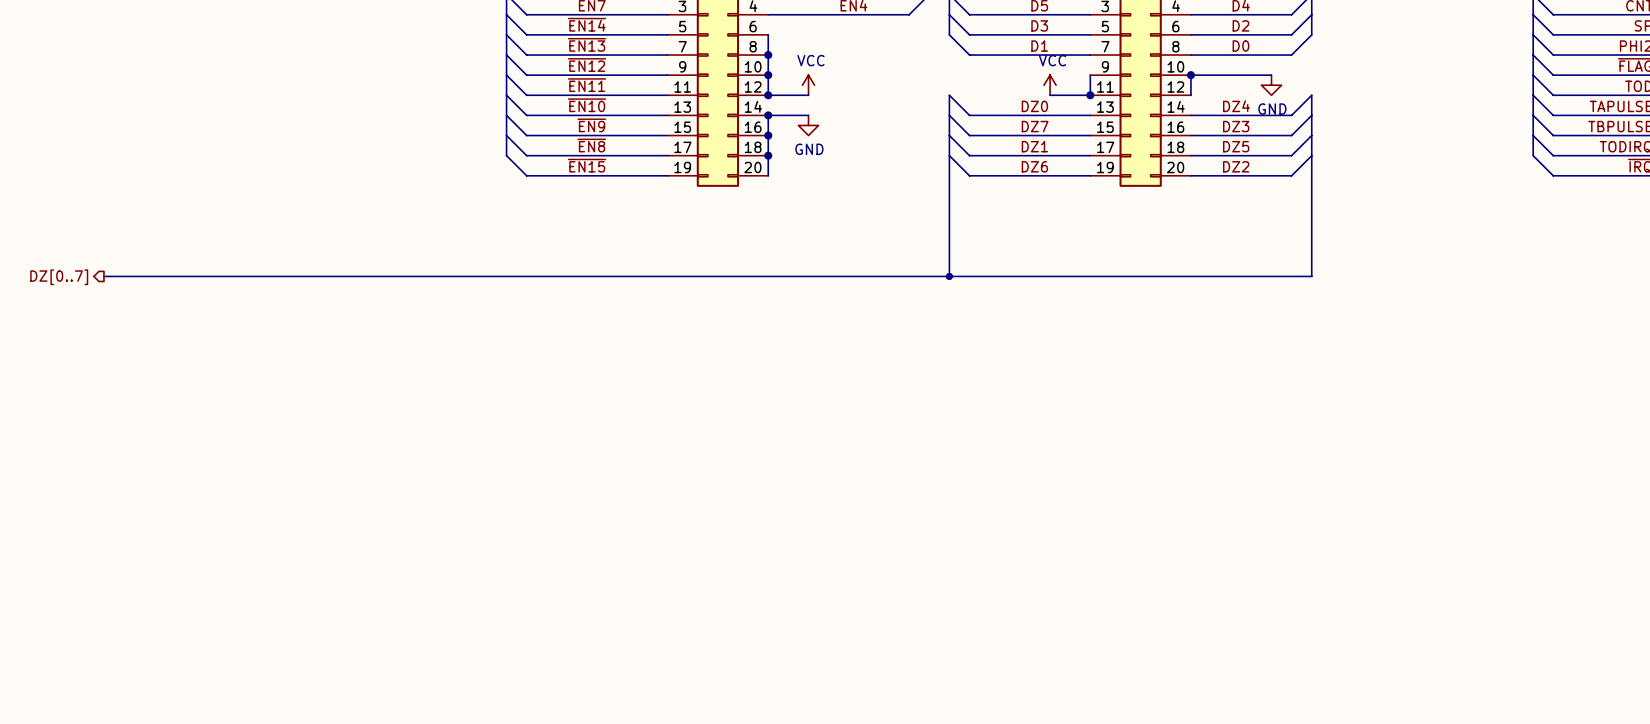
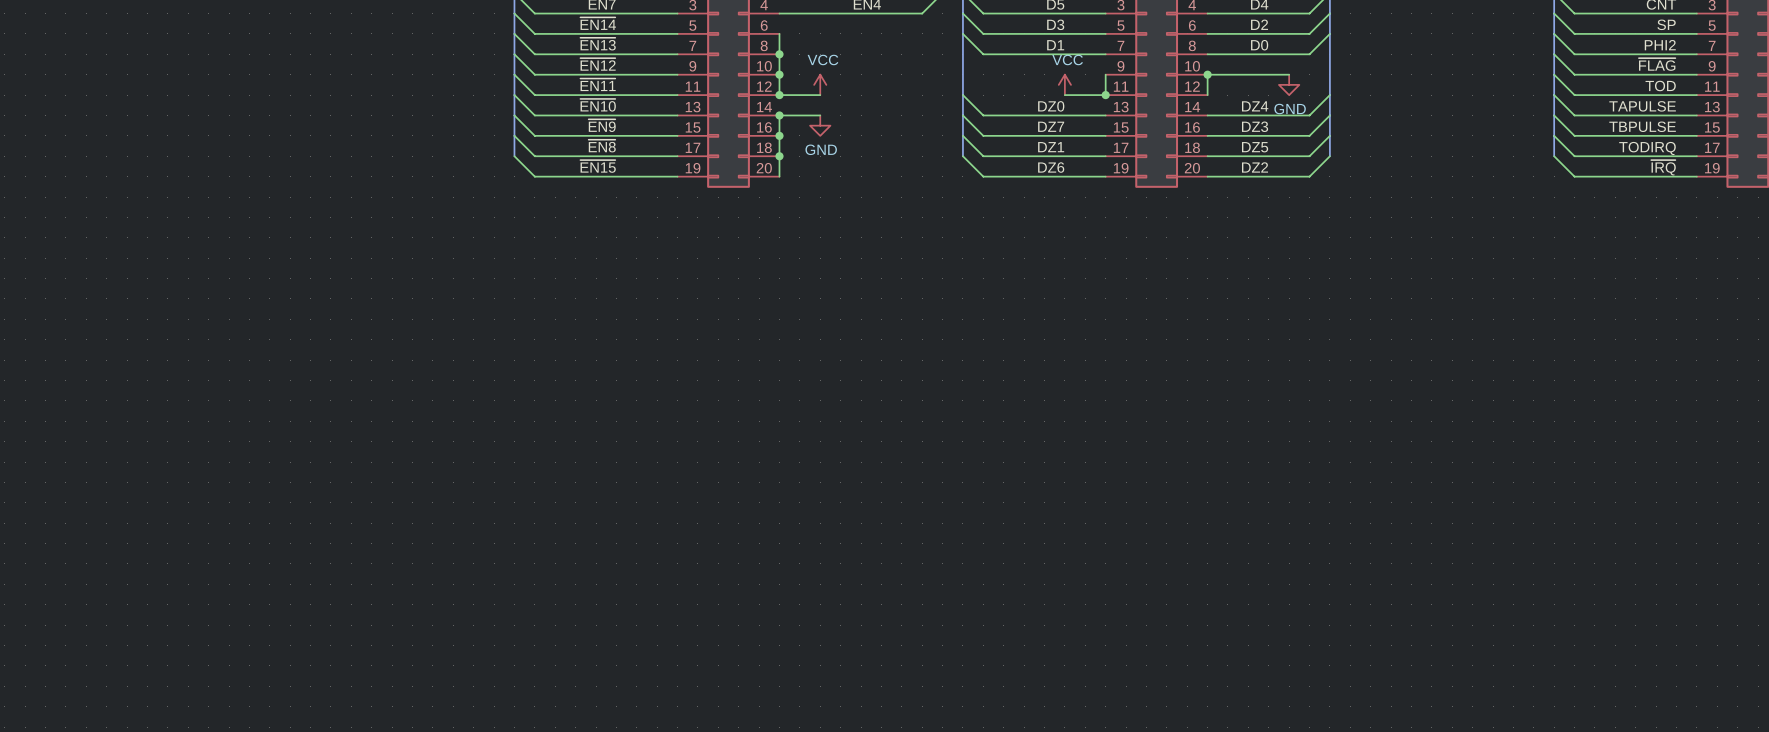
bus: none -> (962, 33) (962, 95)
bus: none -> (1329, 33) (1329, 95)
bus: (949, 155) (949, 276) -> none
bus: (1311, 155) (1311, 276) (103, 276) -> none
junction: (949, 276) -> none
hierarchical label: DZ[0..7] (59, 277) -> none

